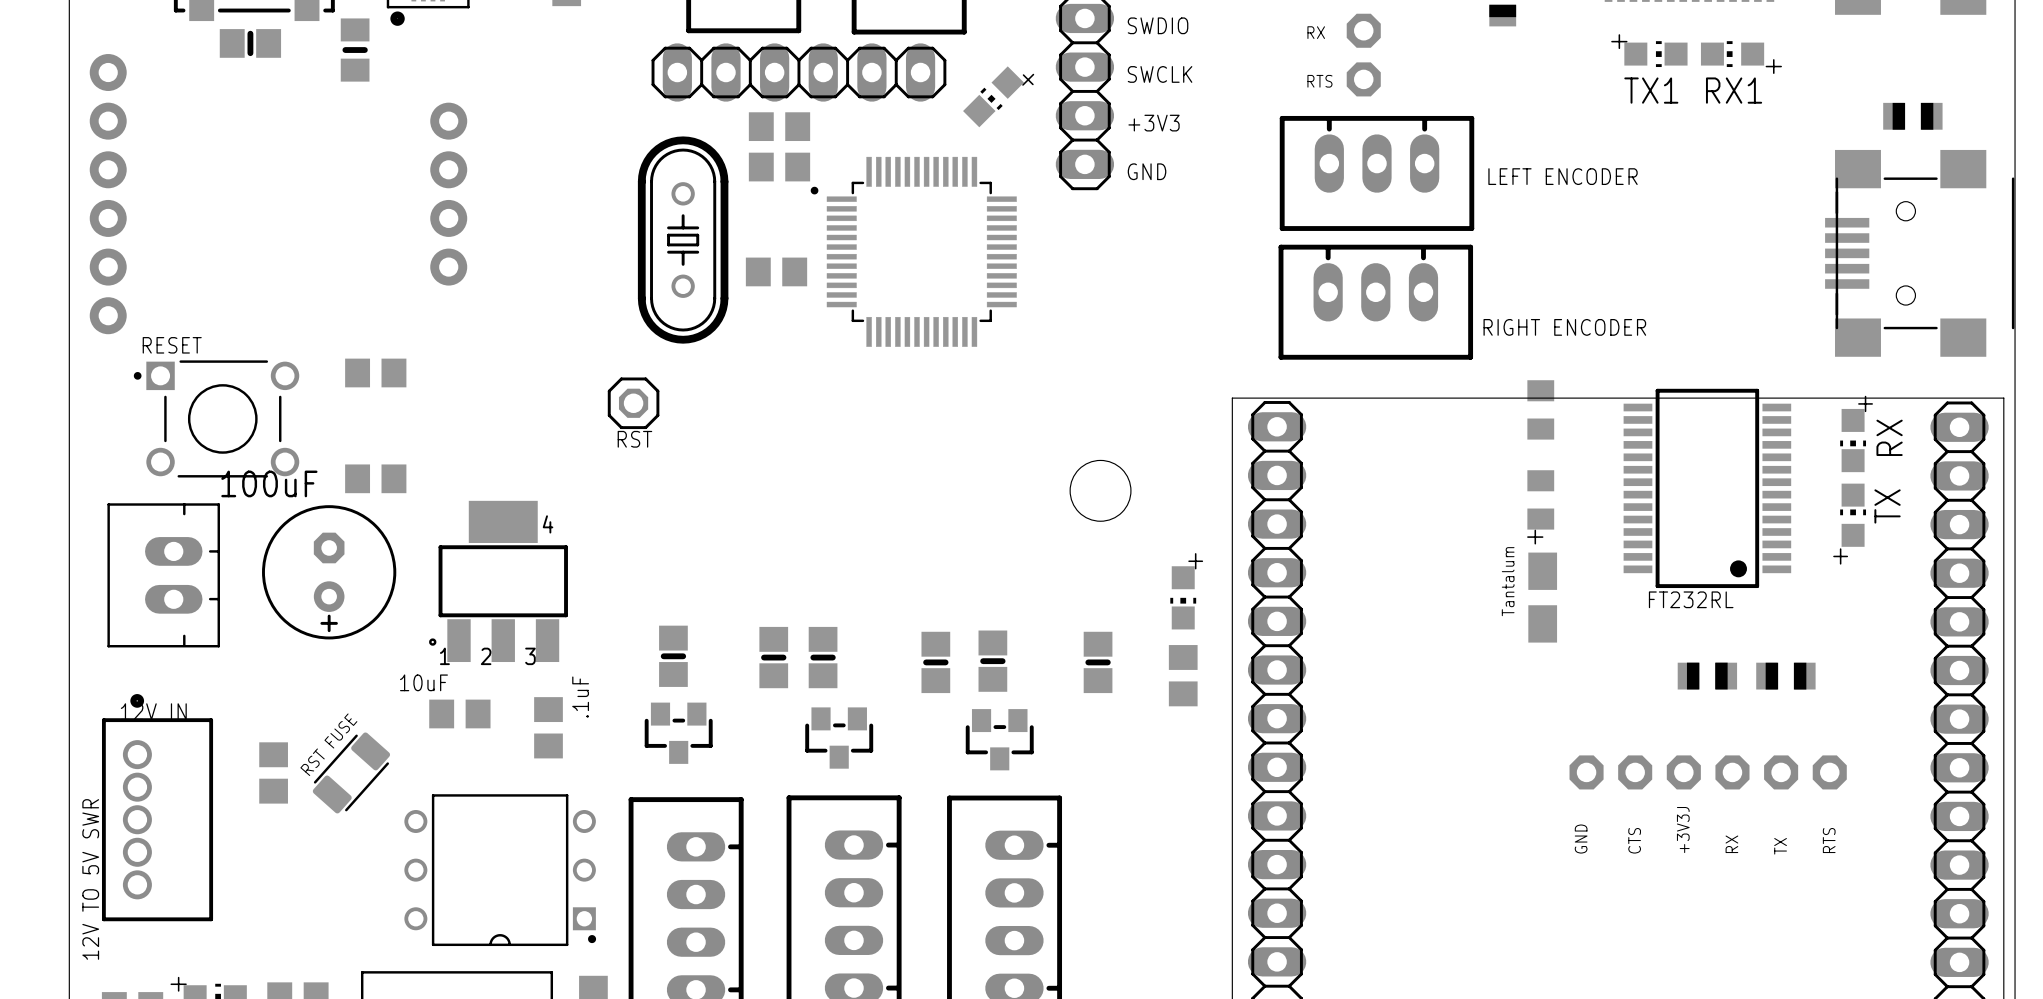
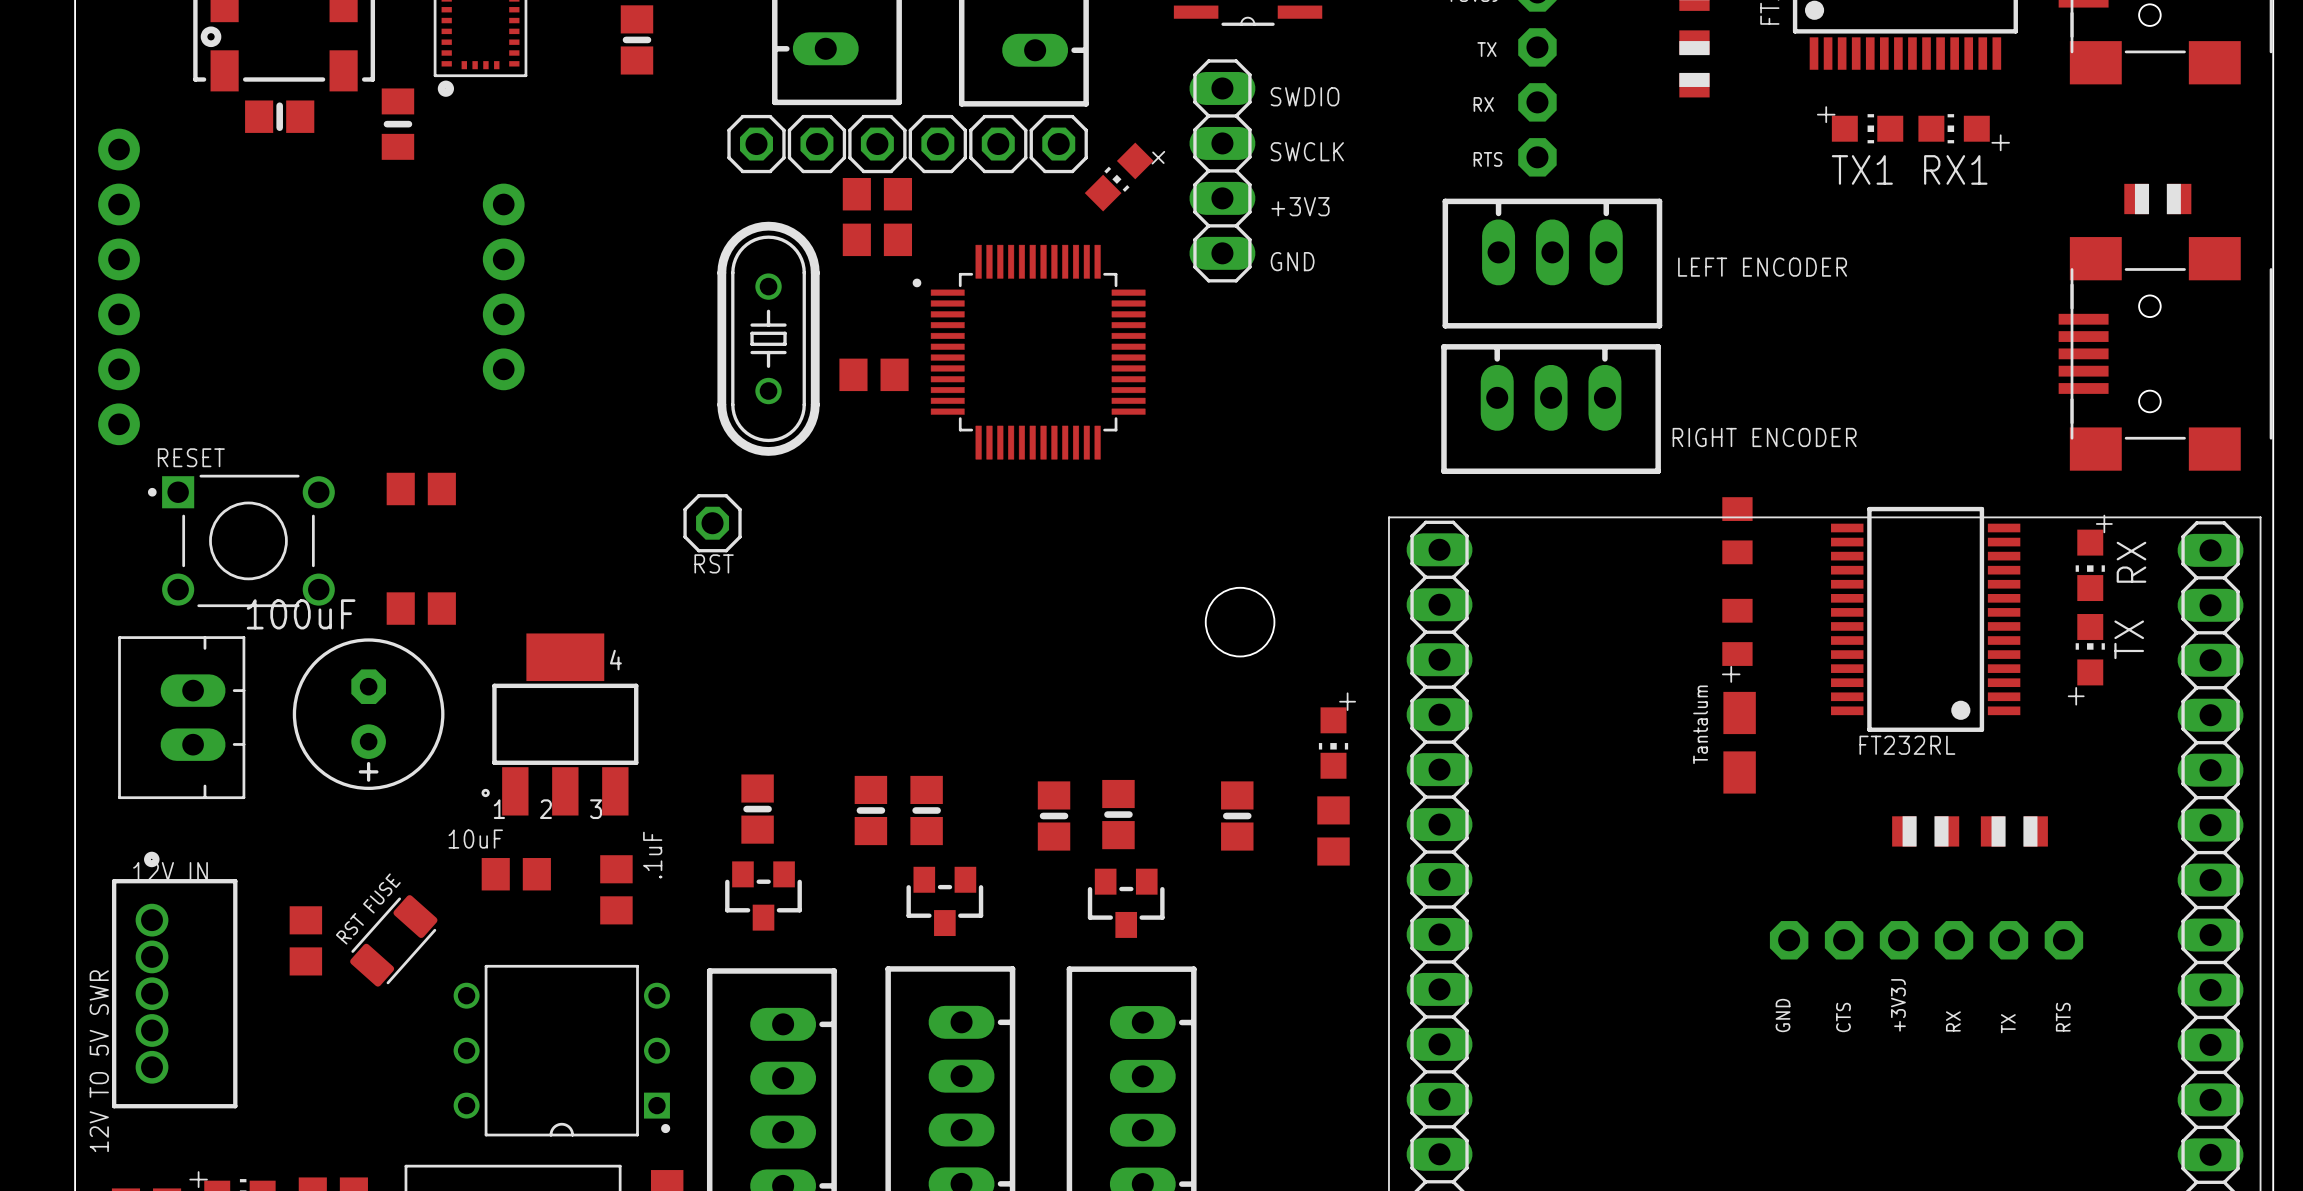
part: none -> (756, 144)
part: none -> (816, 144)
part: none -> (877, 144)
part: none -> (937, 144)
part: none -> (998, 144)
part: none -> (1058, 144)
part: (798, 72) -> none
part: none -> (877, 194)
part: (779, 126) -> none
part: none -> (877, 239)
part: (779, 167) -> none

